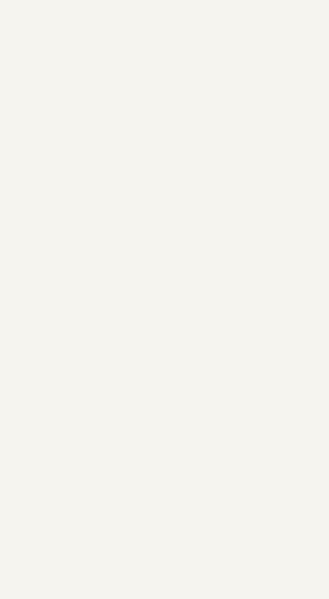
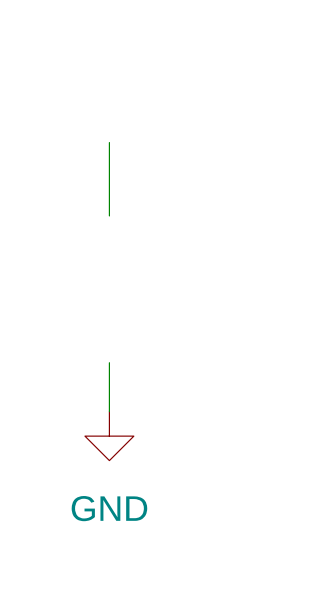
wire: none -> (109, 142) (109, 215)
wire: none -> (109, 362) (109, 411)
power symbol: none -> GND (109, 436)

